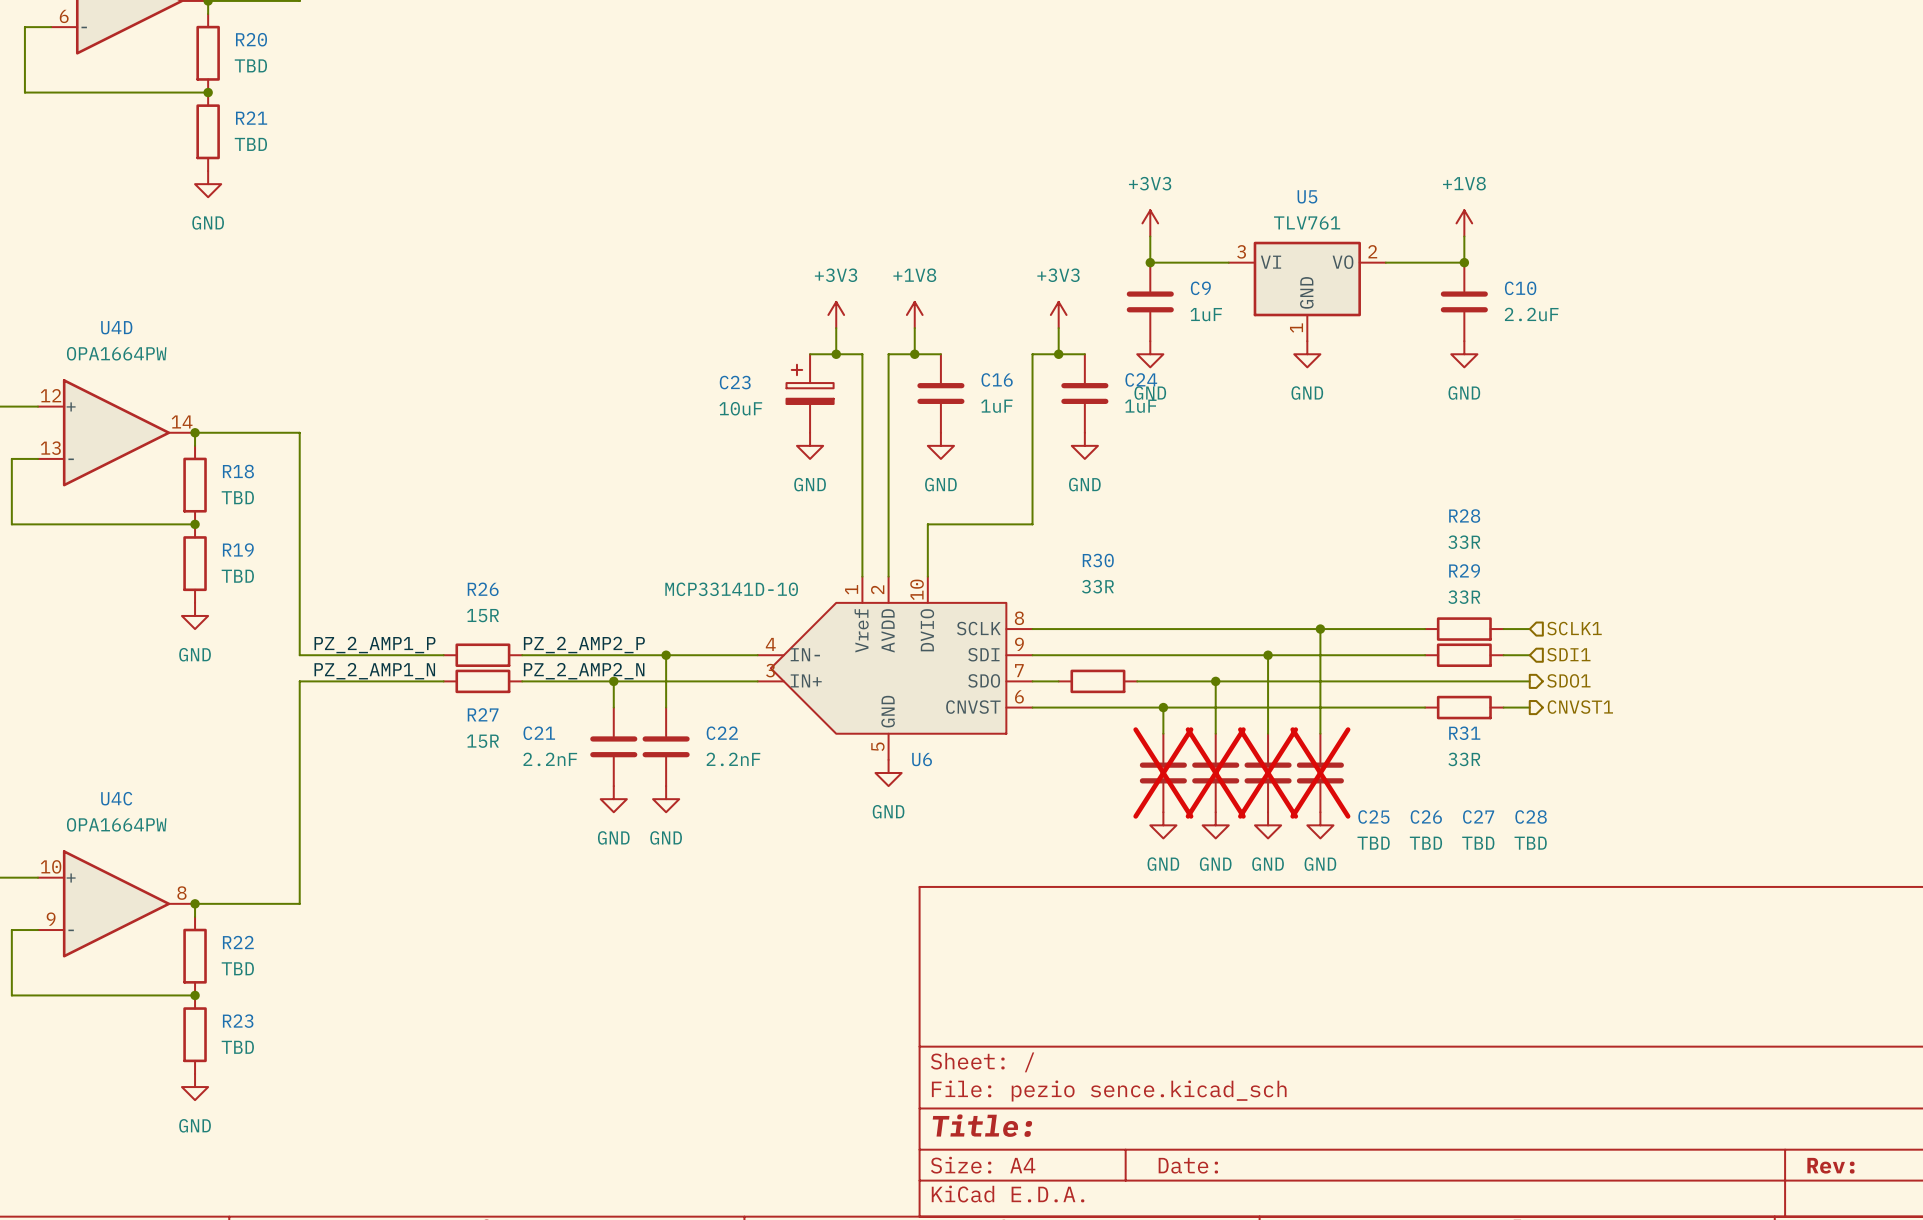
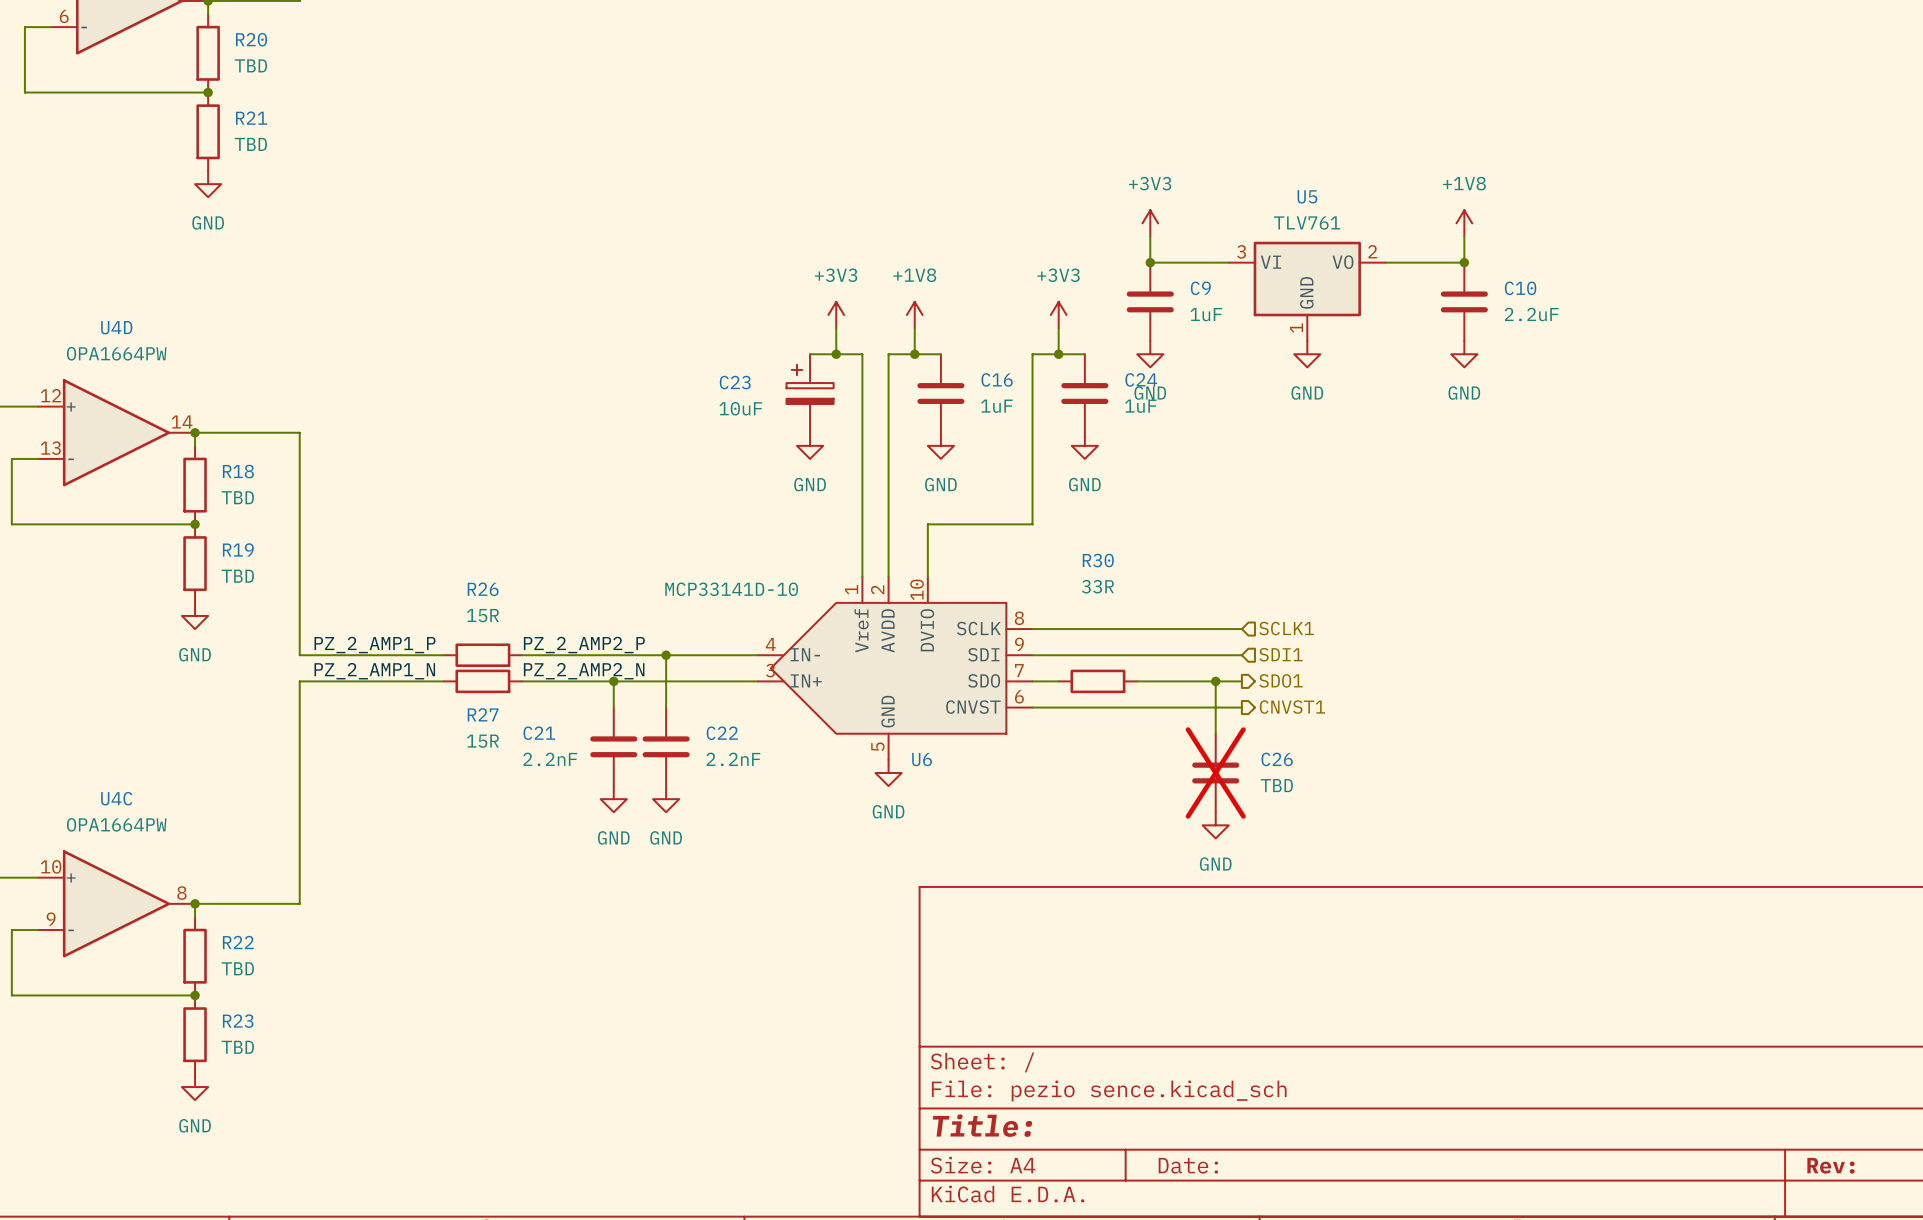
hierarchical label: none -> SCLK1 (1286, 628)
hierarchical label: SCLK1 (1574, 628) -> none
wire: (1241, 629) (1425, 629) -> none
wire: (1320, 629) (1320, 733) -> none
junction: (1320, 629) -> none
R28: 33R (1464, 629) -> none
wire: (1503, 629) (1529, 629) -> none
hierarchical label: none -> SDI1 (1280, 654)
hierarchical label: SDI1 (1568, 654) -> none
wire: (1241, 655) (1425, 655) -> none
wire: (1268, 655) (1268, 733) -> none
junction: (1268, 655) -> none
R29: 33R (1464, 655) -> none
wire: (1503, 655) (1529, 655) -> none
hierarchical label: none -> SDO1 (1280, 680)
hierarchical label: SDO1 (1568, 680) -> none
wire: (1241, 681) (1529, 681) -> none
wire: (1163, 707) (1163, 733) -> none
junction: (1163, 707) -> none
wire: (1241, 707) (1425, 707) -> none
hierarchical label: none -> CNVST1 (1292, 707)
R31: 33R (1464, 707) -> none
wire: (1503, 707) (1529, 707) -> none
hierarchical label: CNVST1 (1580, 707) -> none
C25: TBD (1163, 772) -> none
C27: TBD (1268, 772) -> none
C28: TBD (1320, 772) -> none
C26 name position: C26 (1426, 816) -> C26 (1277, 759)
power symbol: GND (1163, 825) -> none
power symbol: GND (1268, 825) -> none
power symbol: GND (1320, 825) -> none
C26 value position: TBD (1425, 843) -> TBD (1276, 785)

